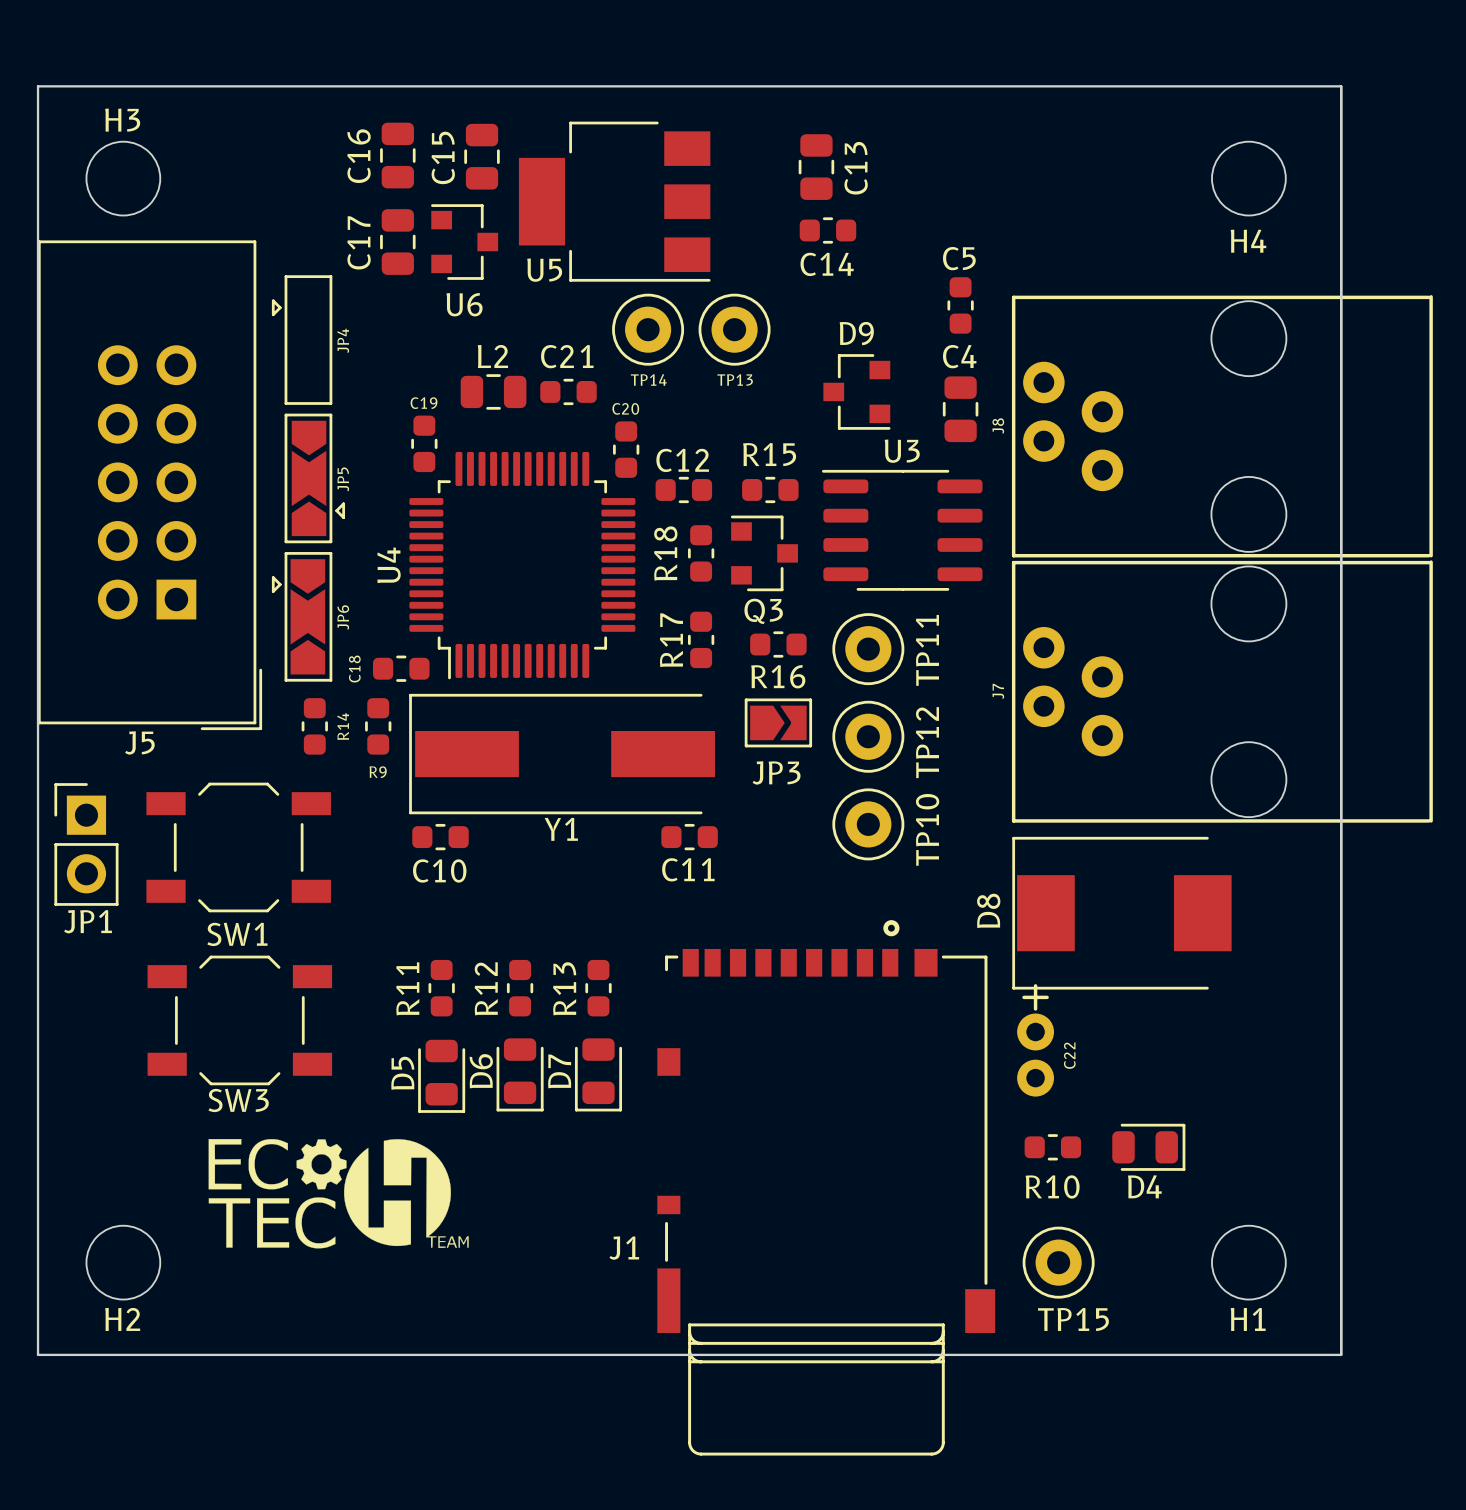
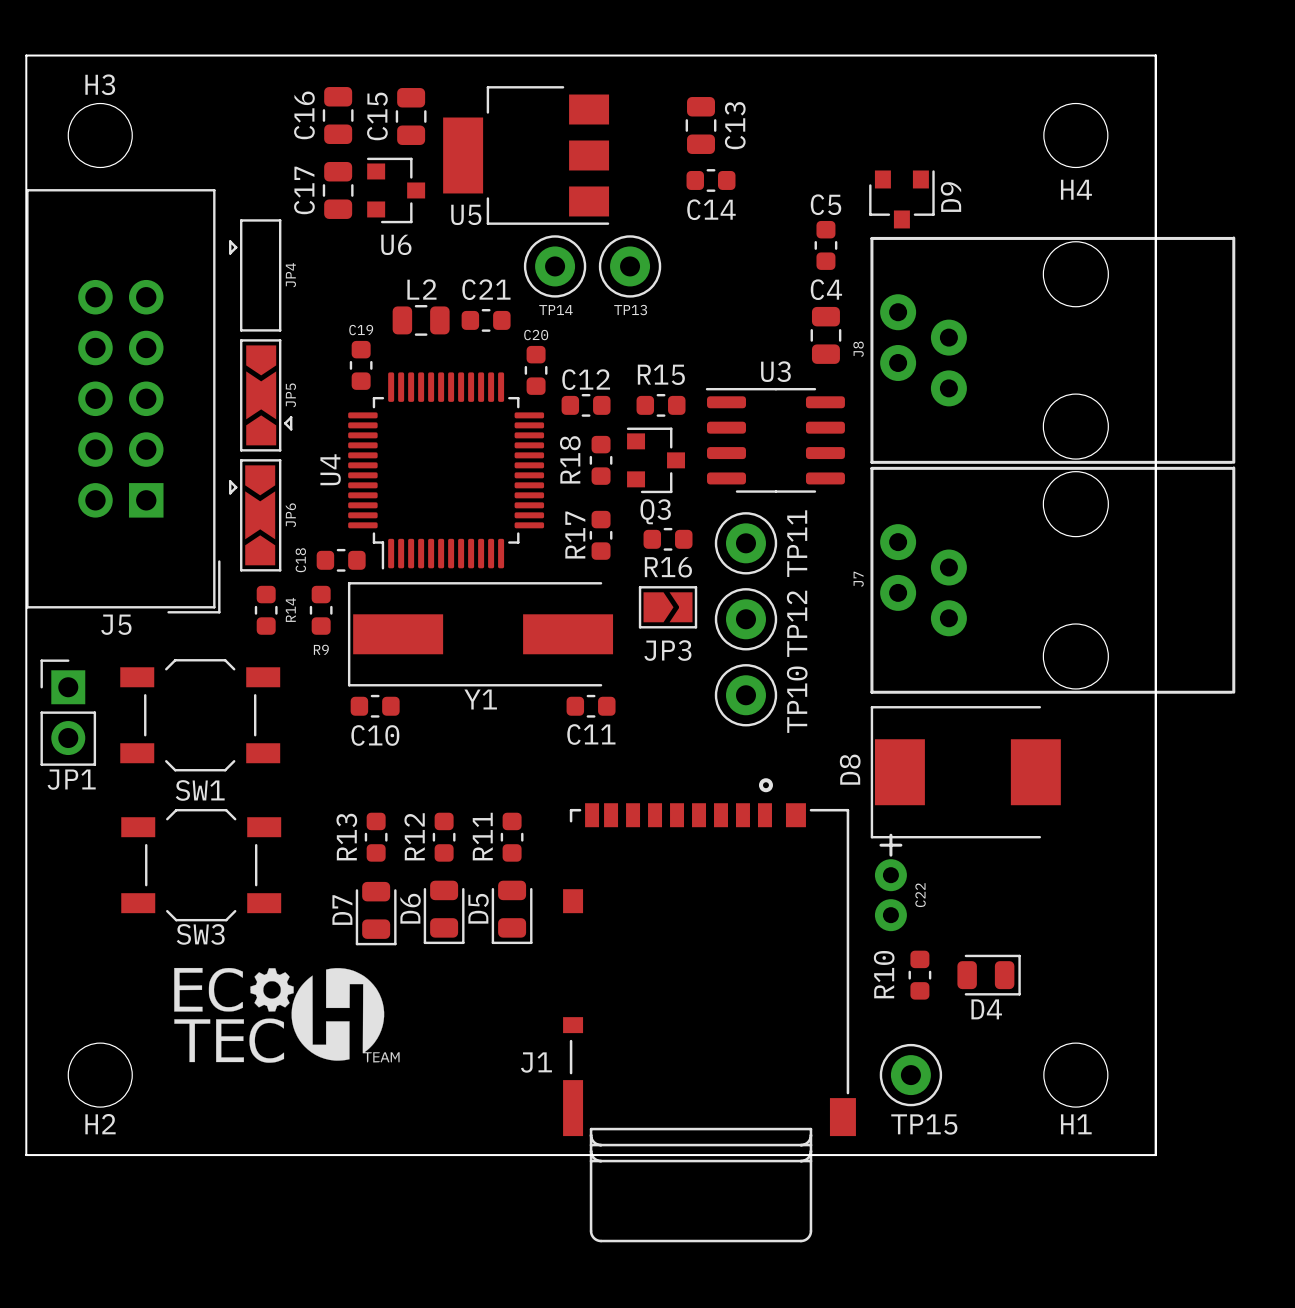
D9 name position: D9 (856, 333) -> D9 (950, 197)
D9 rotation: 0° (856, 391) -> 90° counterclockwise (901, 199)
D9 position: (856, 391) -> (901, 199)
R11 name: R11 (407, 988) -> R13 (346, 837)
R13 name: R13 (564, 988) -> R11 (482, 836)
D7 name: D7 (559, 1071) -> D5 (478, 908)
D5 name: D5 (402, 1073) -> D7 (342, 910)
R10 rotation: 0° (1052, 1147) -> 90° clockwise (919, 975)

